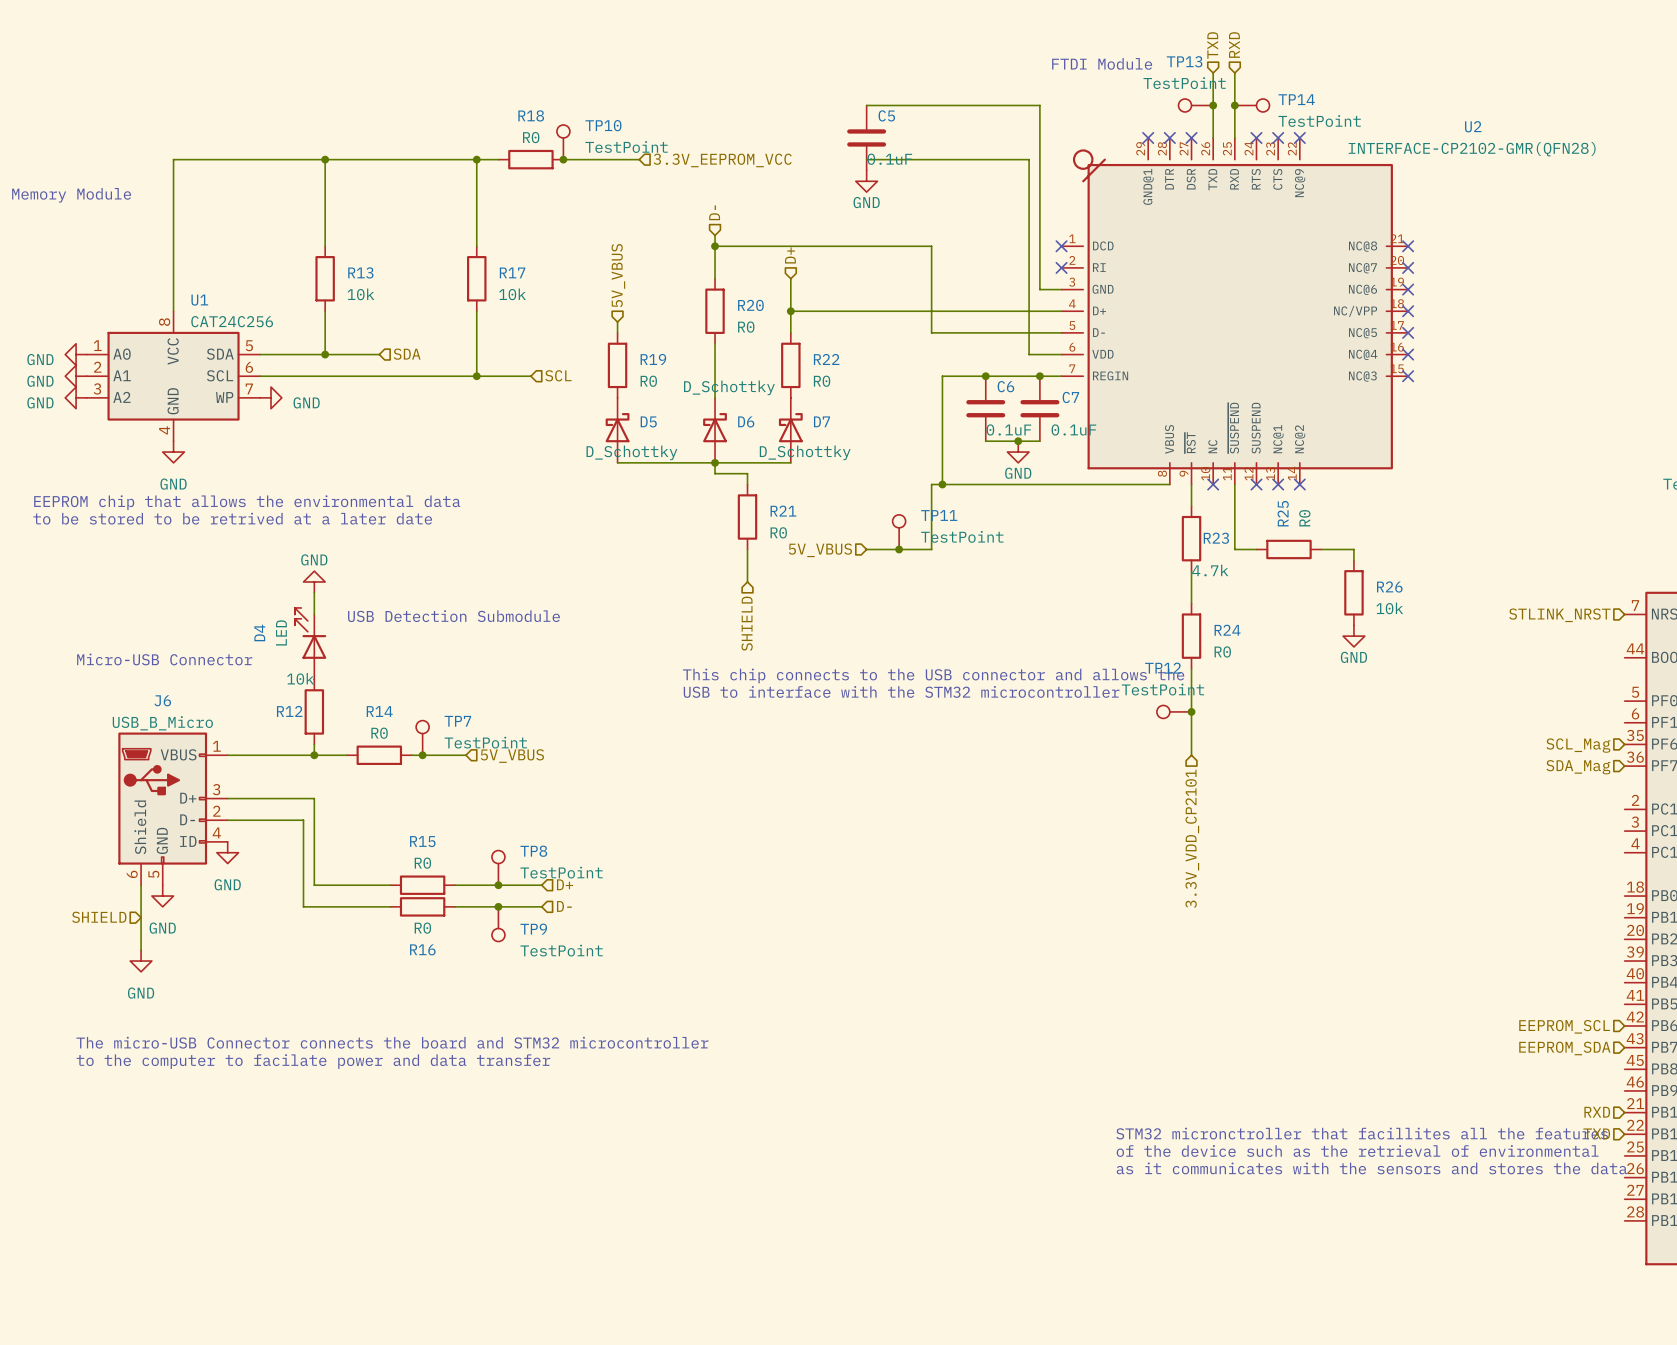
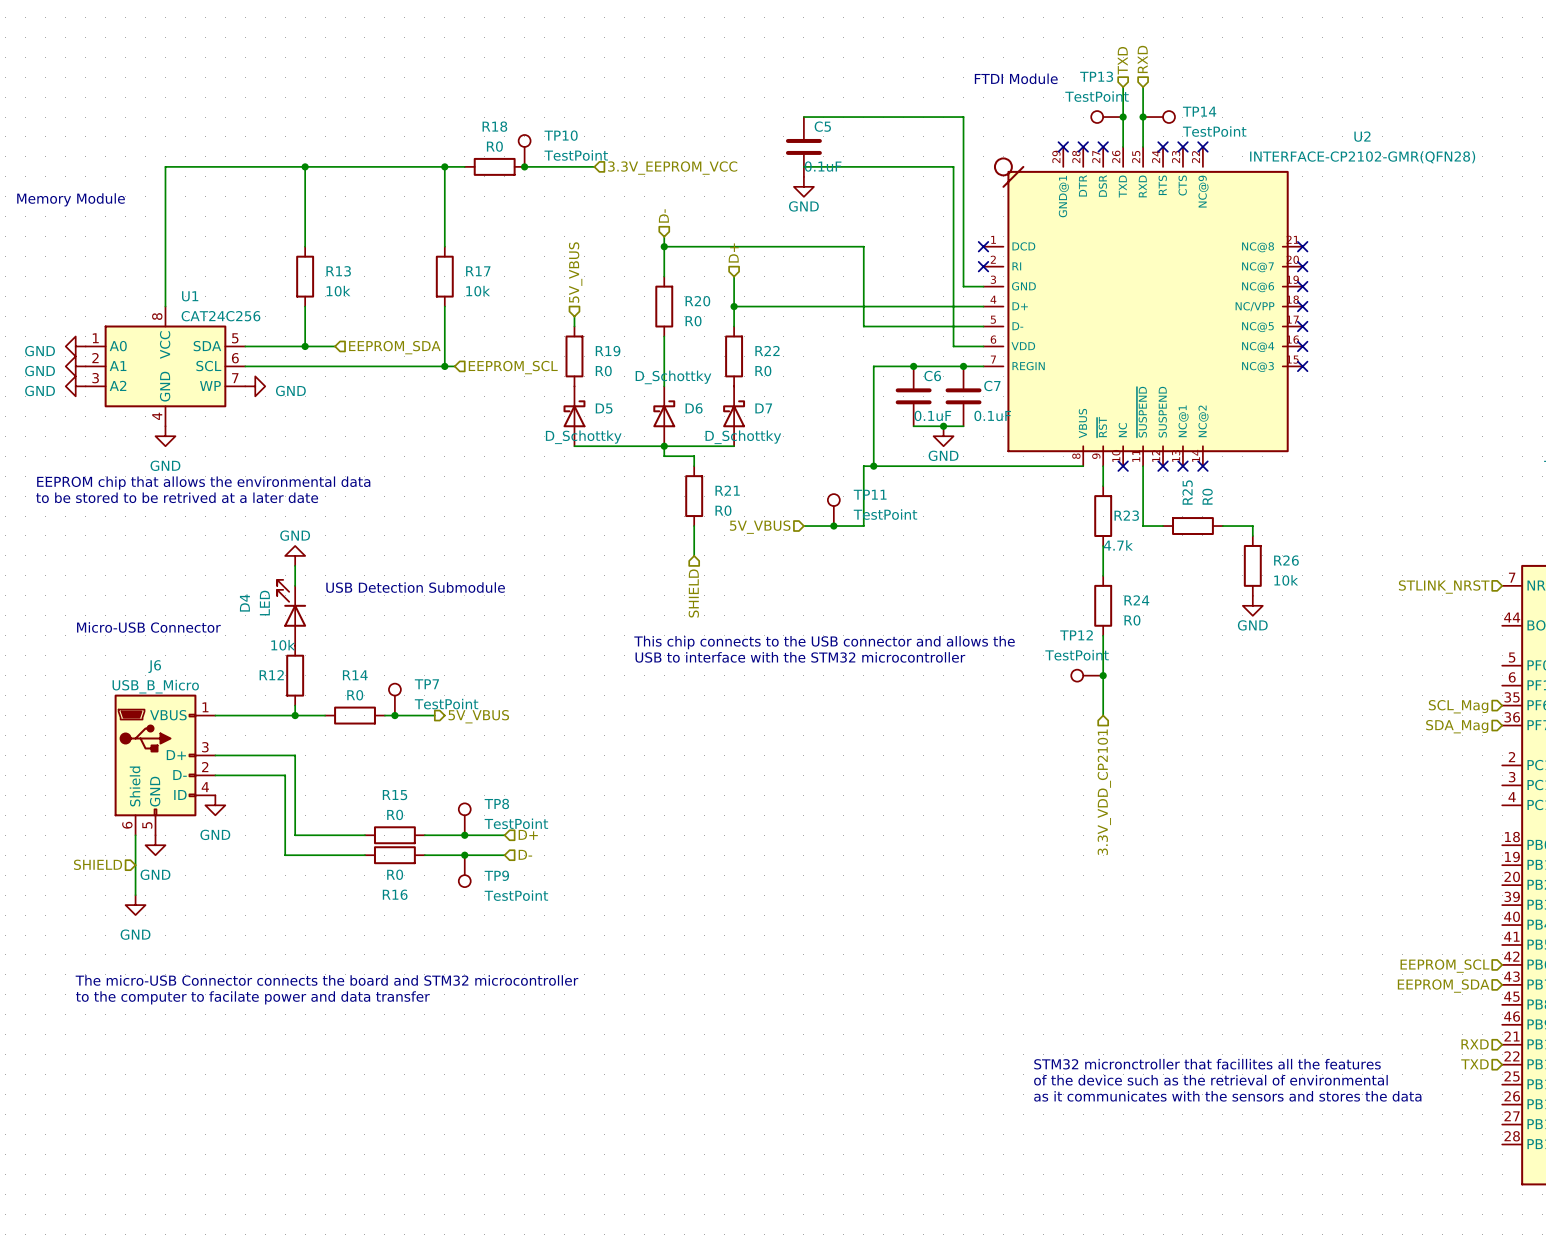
wire: (357, 354) (379, 354) -> none
hierarchical label: SDA (407, 354) -> none
hierarchical label: none -> EEPROM_SDA (394, 347)
hierarchical label: SCL (558, 375) -> none
wire: (487, 376) (530, 376) -> none
hierarchical label: none -> EEPROM_SCL (513, 367)
hierarchical label shape: input (512, 756) -> output (478, 716)

